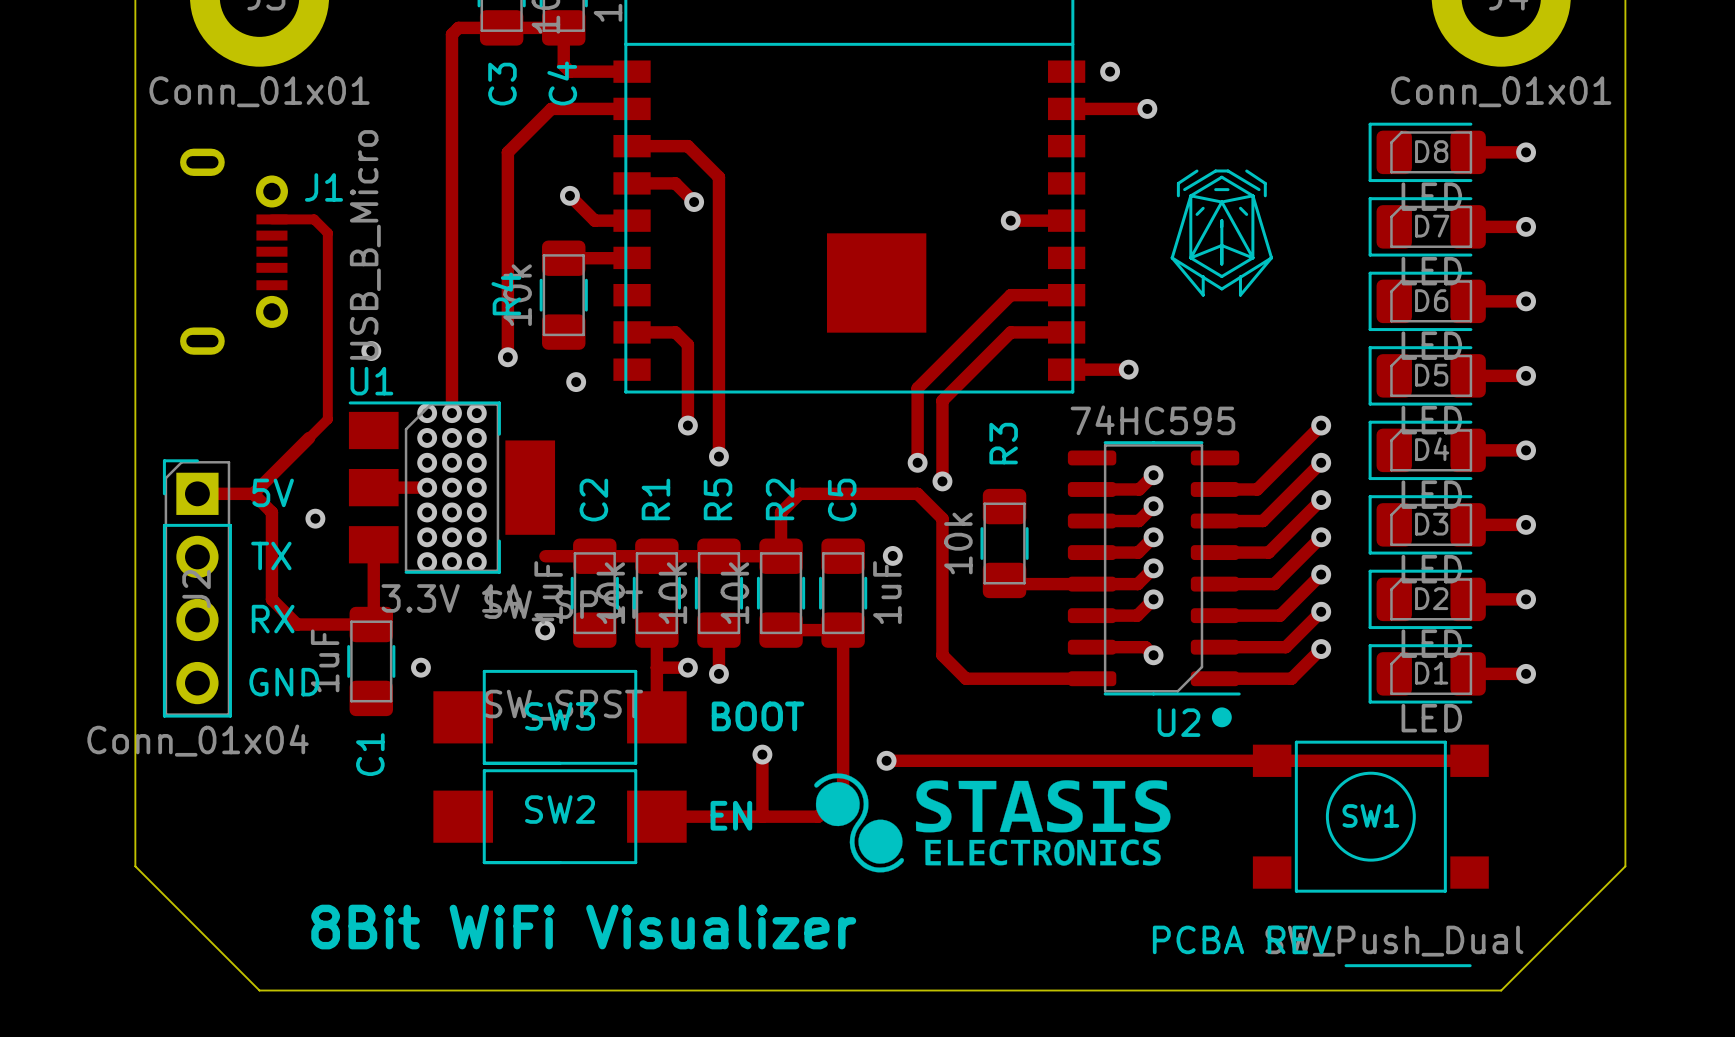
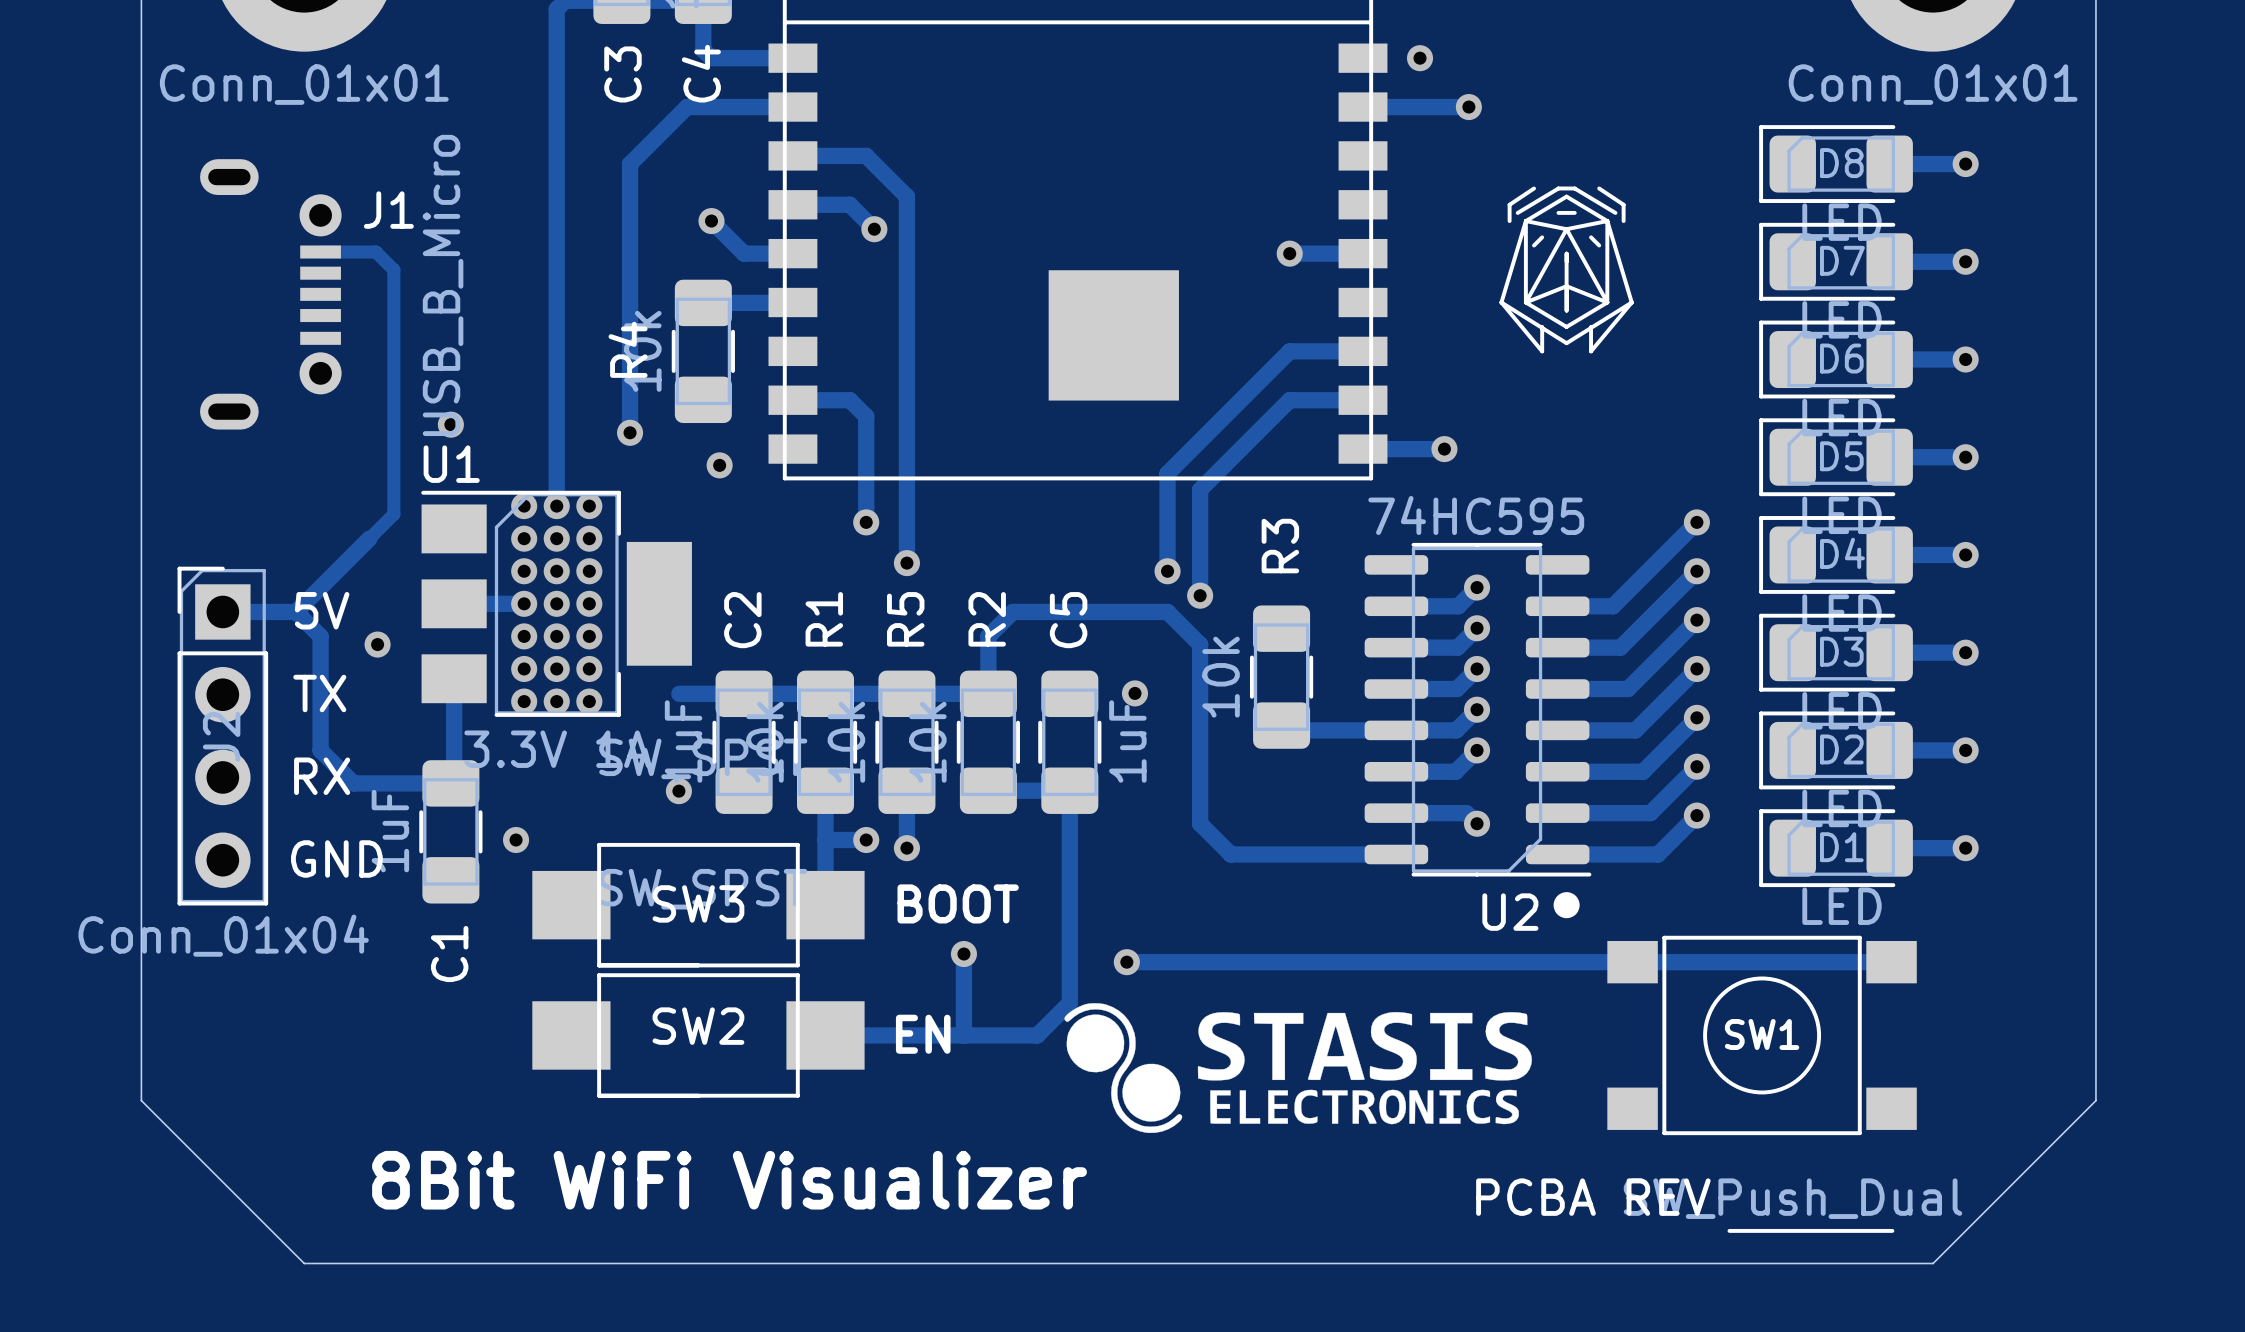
drawing position: (992, 822) -> (1298, 1068)

